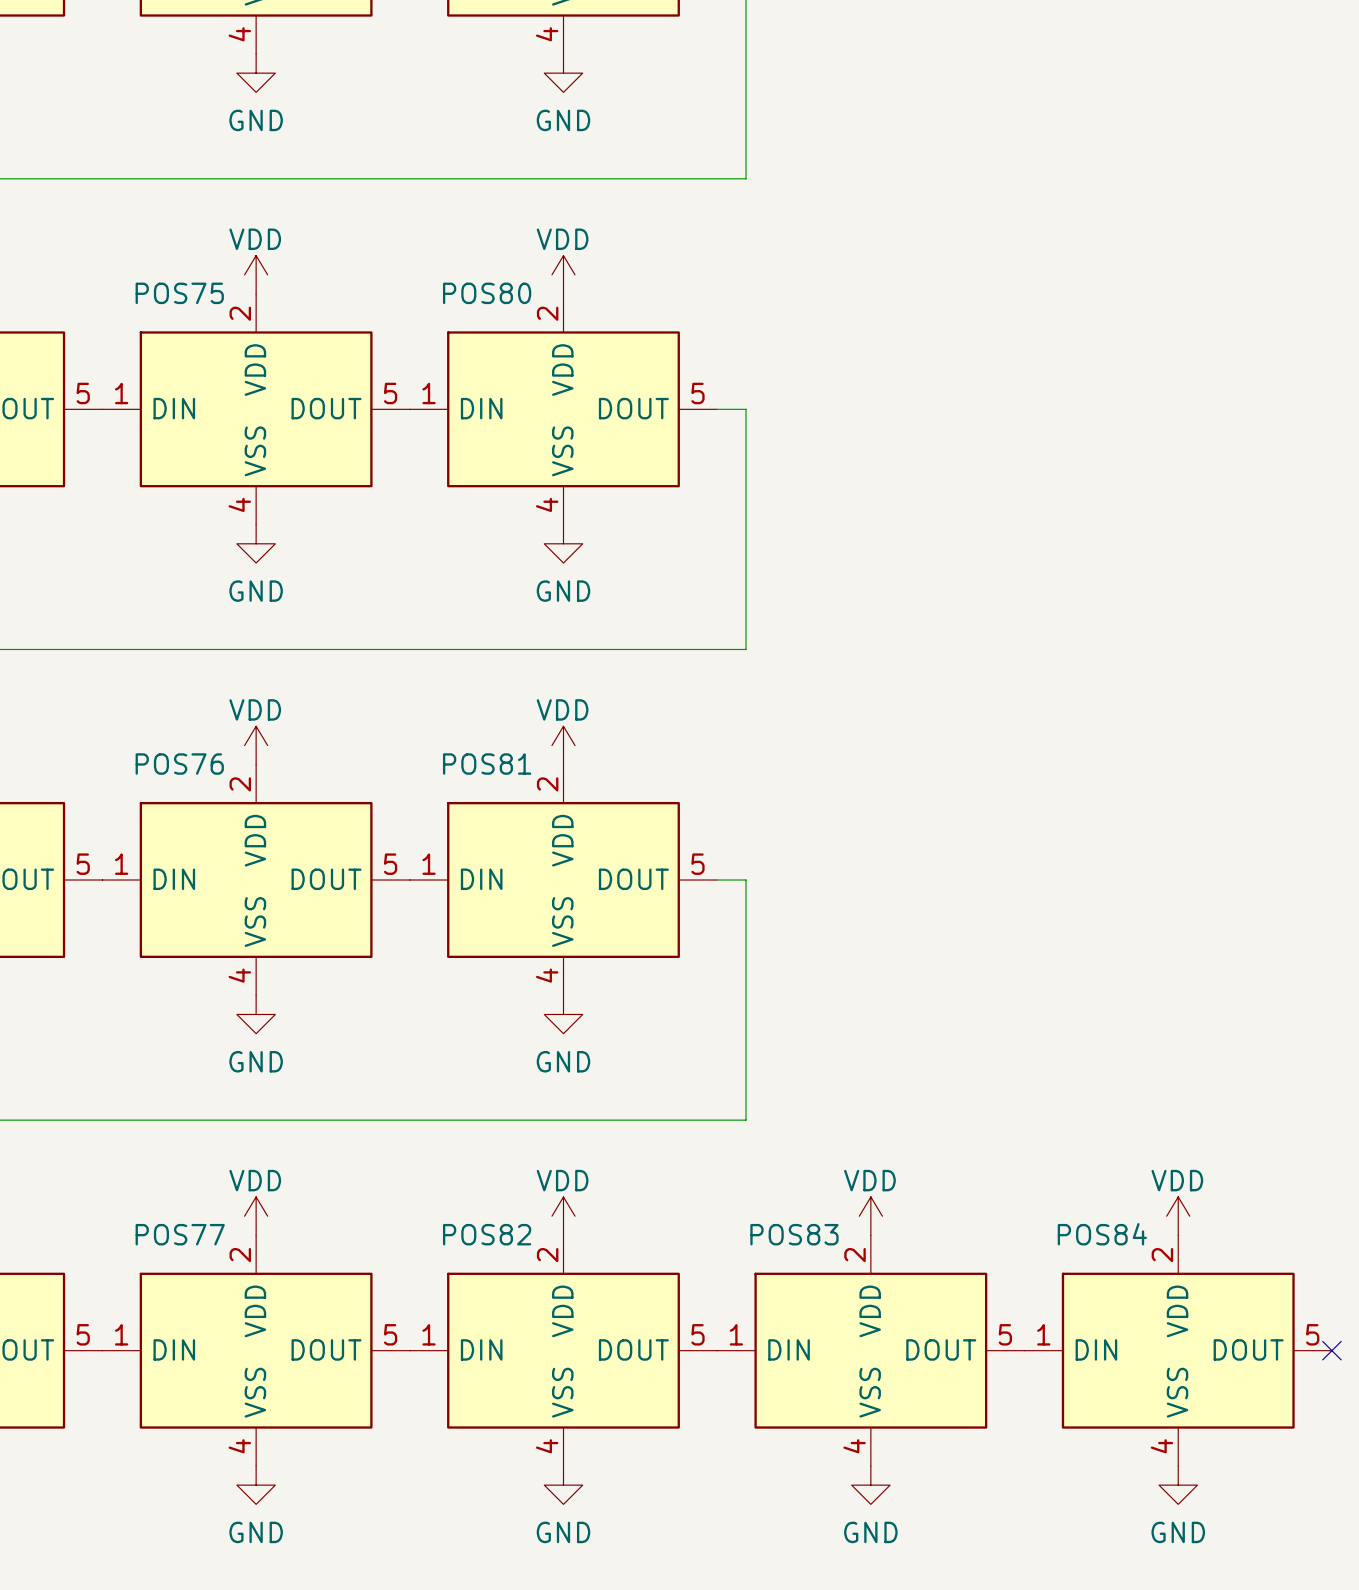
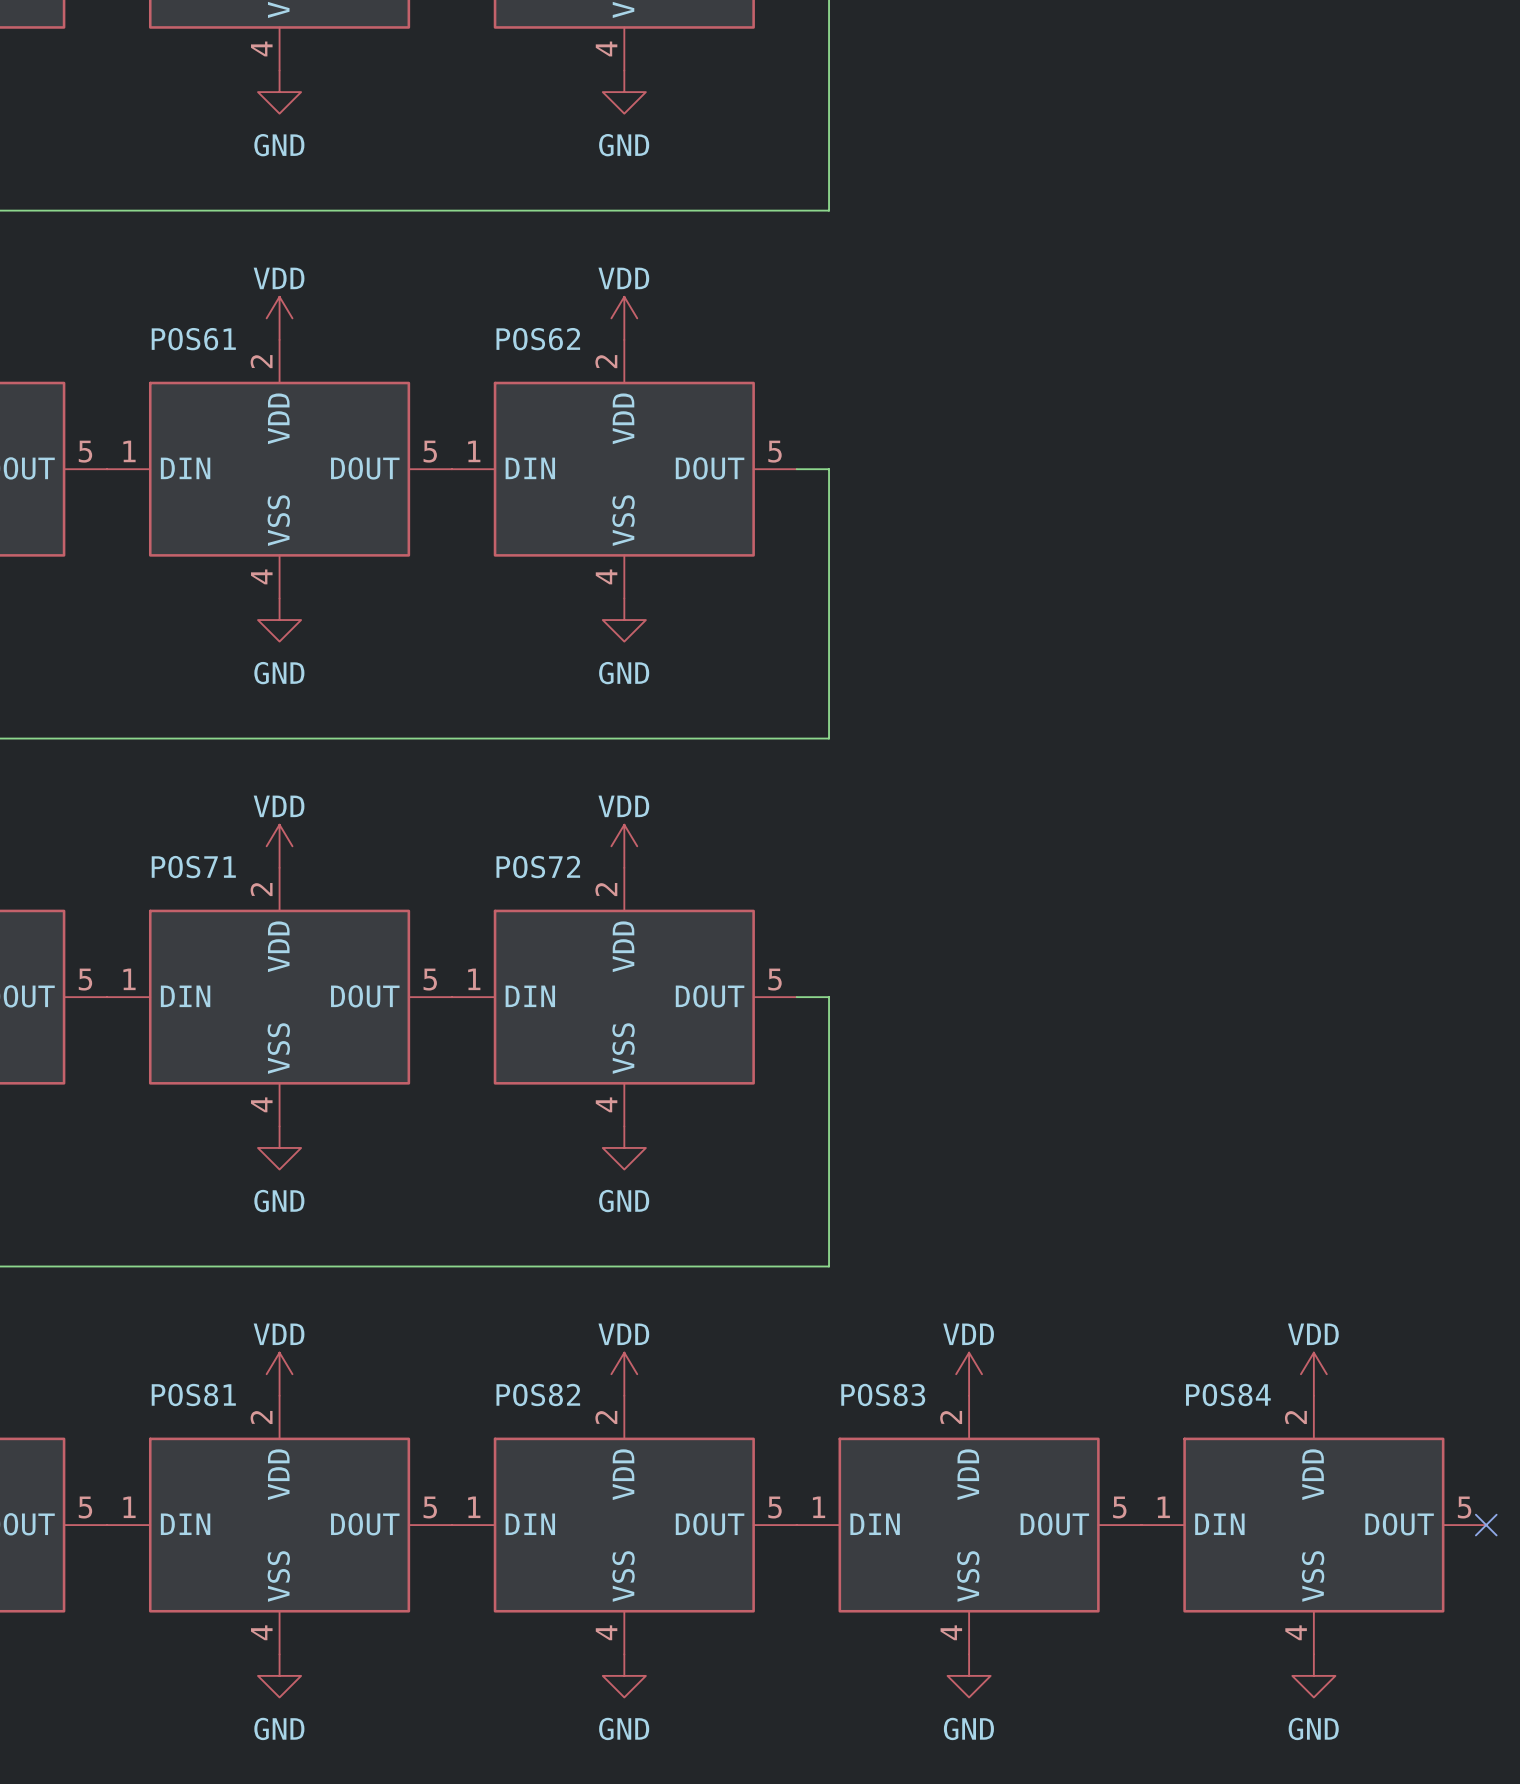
POS75 name: POS75 (179, 293) -> POS61 (193, 339)
POS80 name: POS80 (487, 293) -> POS62 (538, 339)
POS76 name: POS76 (179, 764) -> POS71 (193, 867)
POS81 name: POS81 (487, 764) -> POS72 (538, 867)
POS77 name: POS77 (180, 1234) -> POS81 (193, 1394)

